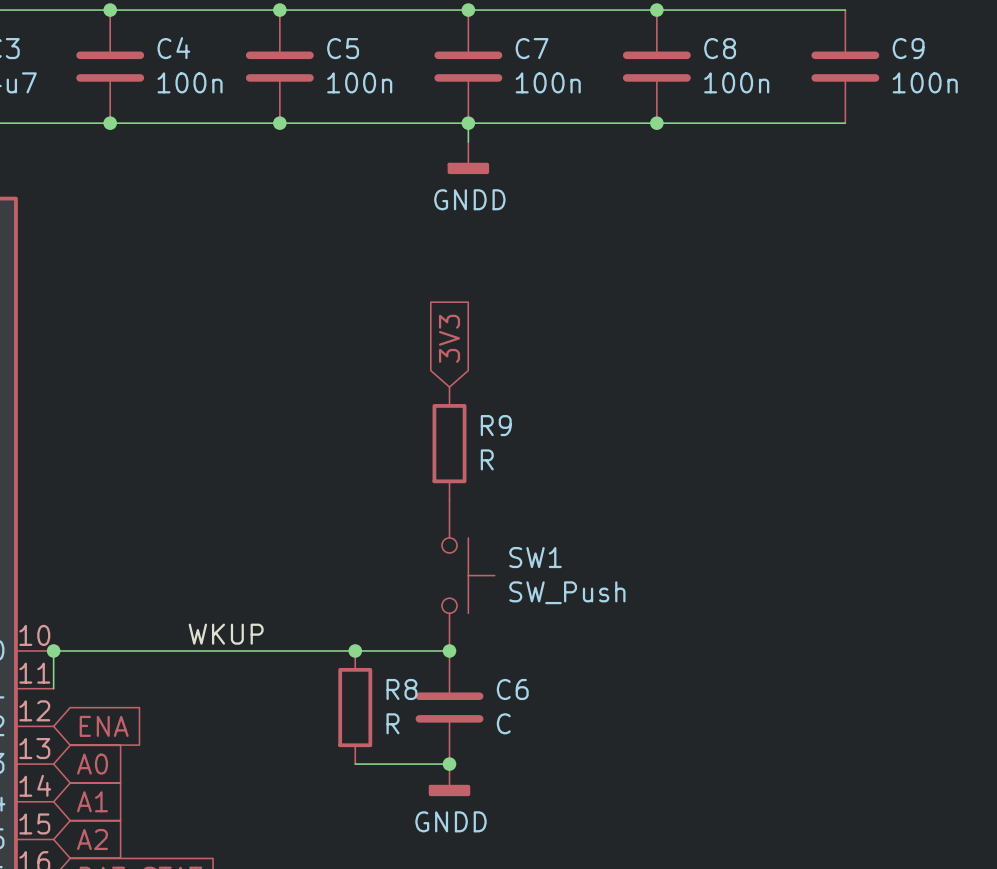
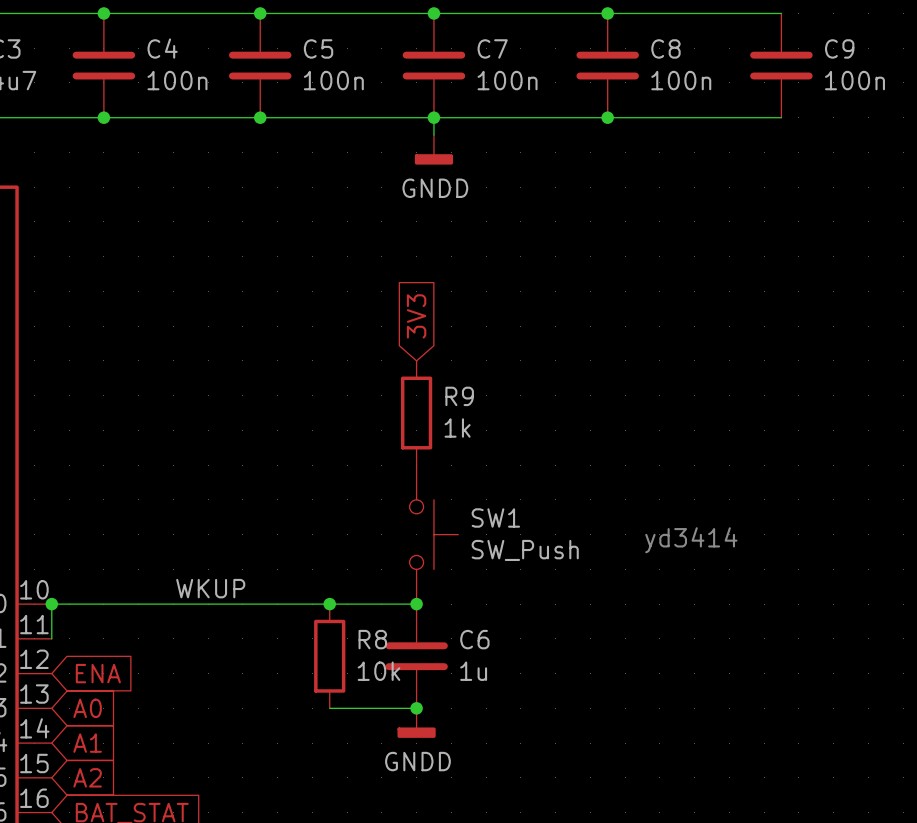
R9 value: R (487, 459) -> 1k (457, 428)
text: none -> yd3414 (691, 540)
R8 value: R (393, 723) -> 10k (379, 671)
C6 value: C (503, 723) -> 1u (473, 671)

